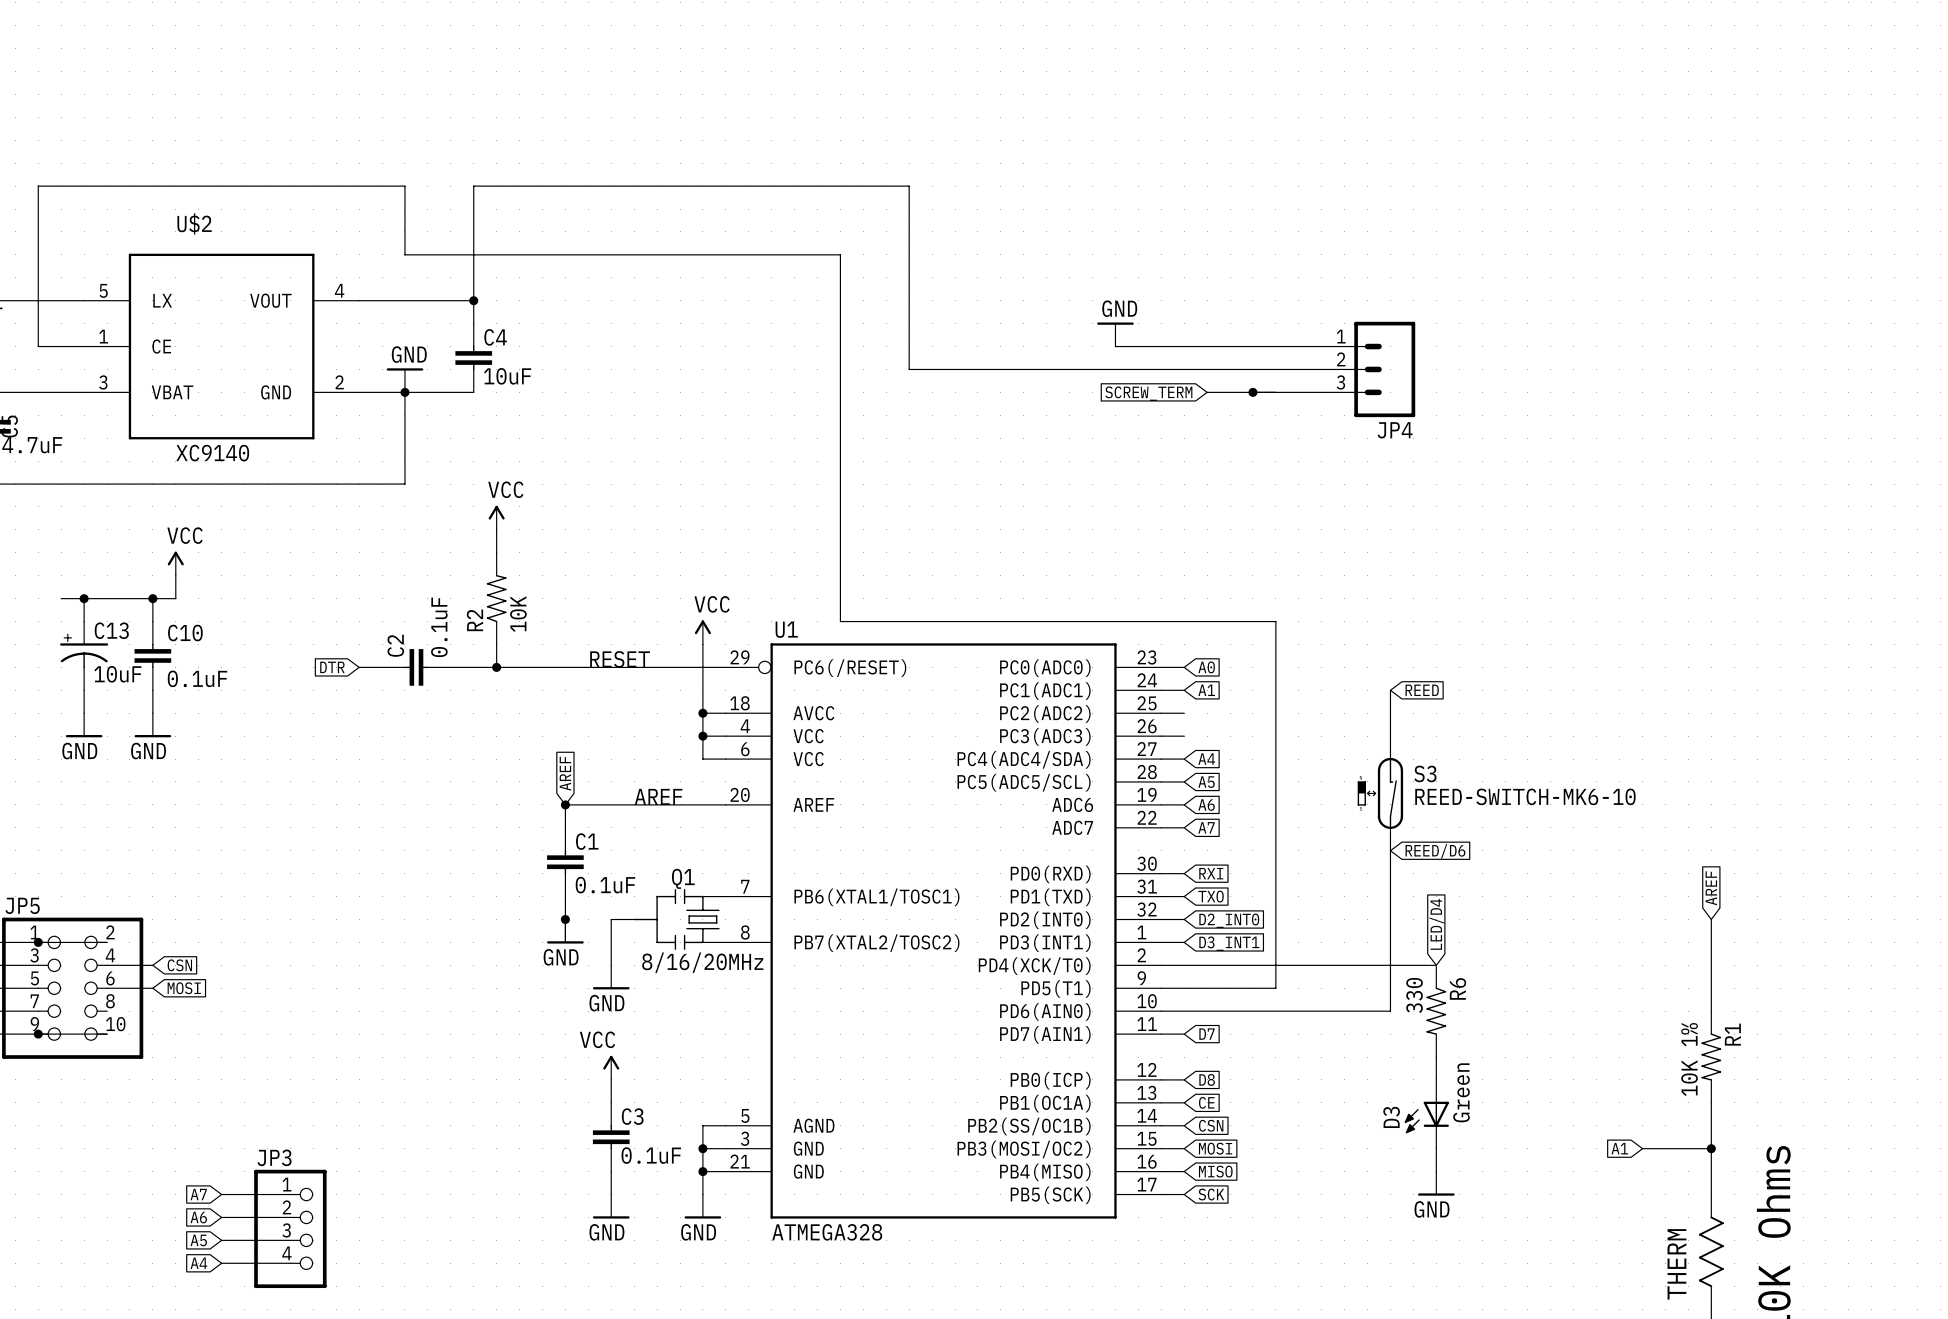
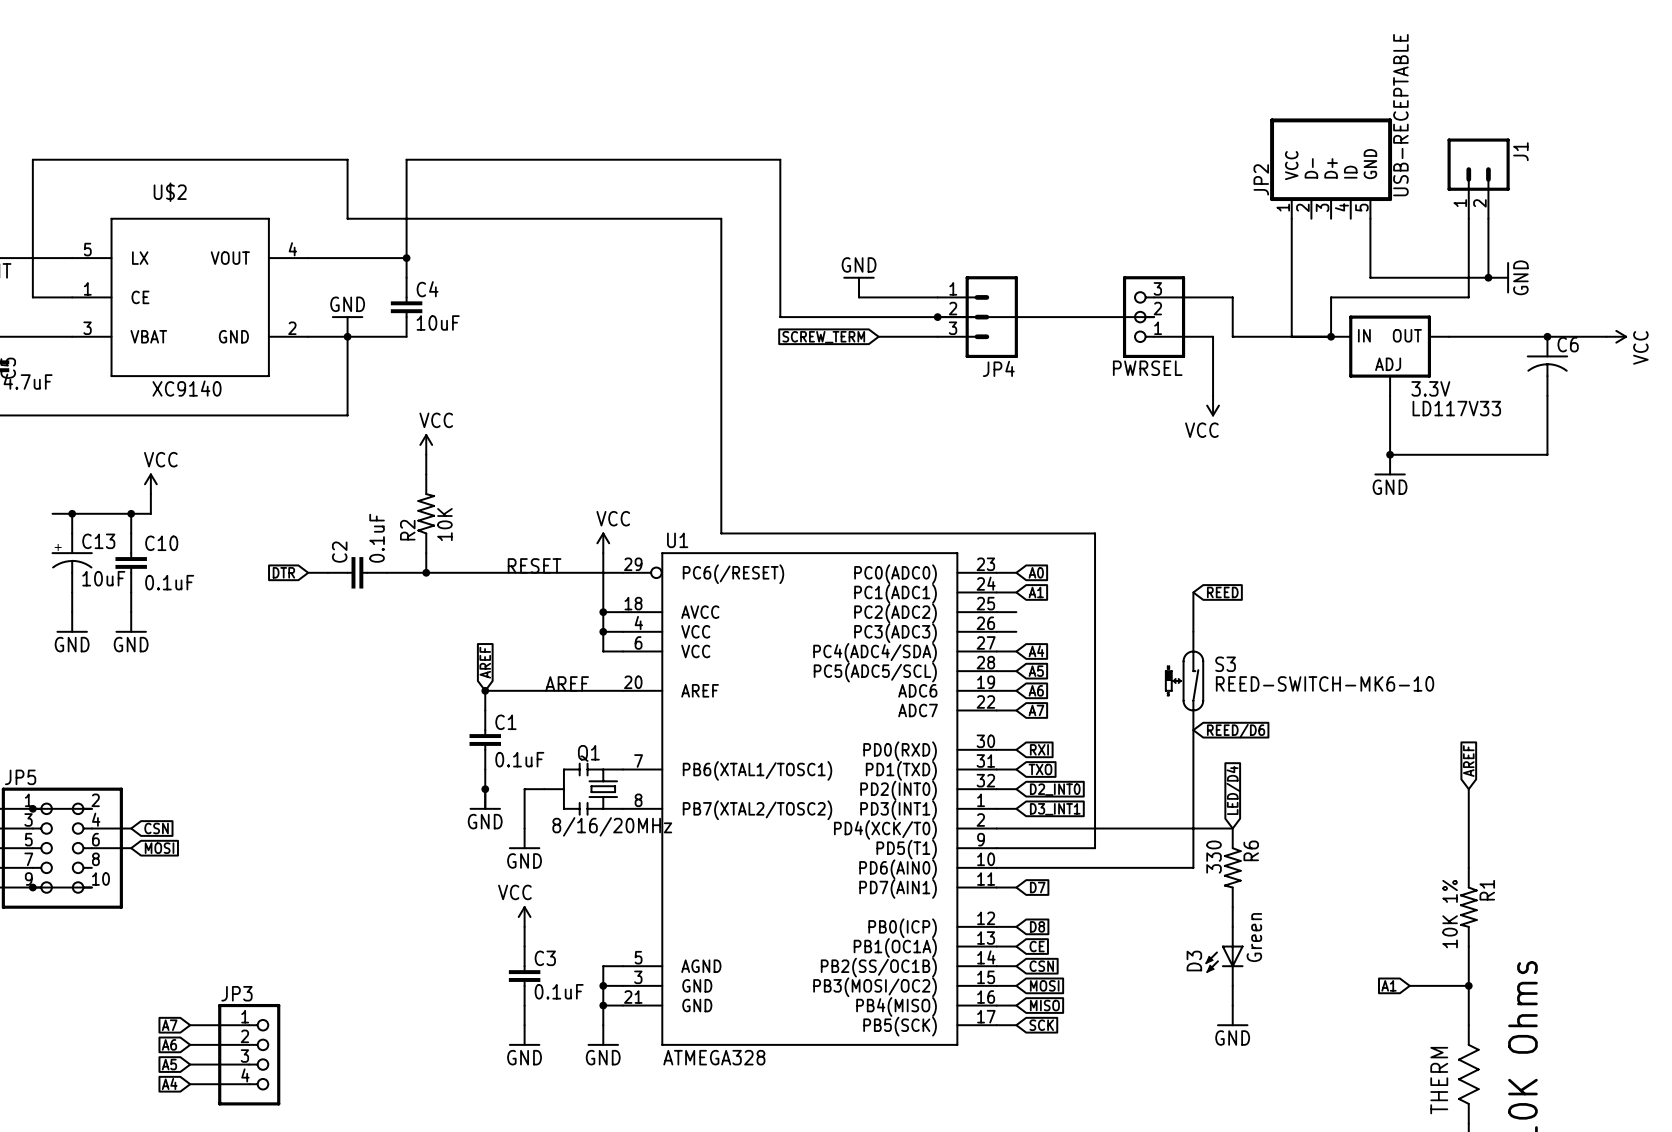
JP2: none -> USB-RECEPTABLE (1331, 168)
J1: none -> (1478, 178)
wire: none -> (1291, 218) (1291, 336)
wire: none -> (1370, 218) (1370, 277) (1488, 277) (1488, 218)
wire: none -> (1468, 218) (1468, 297) (1331, 297) (1331, 336) (1232, 336) (1232, 297) (1154, 297)
junction: none -> (1488, 277)
power symbol: none -> GND (1498, 277)
power symbol position: GND (1115, 334) -> GND (859, 287)
wire: none -> (859, 297) (937, 297)
wire: (1115, 346) (1321, 346) -> none
junction: none -> (937, 317)
PWRSEL: none -> (1154, 317)
JP4 position: (1368, 369) -> (977, 317)
wire: none -> (878, 336) (937, 336)
wire: (1207, 392) (1321, 392) -> none
junction: (1252, 392) -> none
wire: none -> (1154, 336) (1213, 336) (1213, 395)
junction: none -> (1331, 336)
wire: none -> (1449, 336) (1606, 336)
junction: none -> (1547, 336)
power symbol: none -> VCC (1616, 336)
global label position: SCREW_TERM (1148, 393) -> SCREW_TERM (823, 337)
3.3V: none -> LD117V33 (1390, 355)
C6: none -> (1547, 366)
wire: none -> (1390, 395) (1390, 454) (1547, 454) (1547, 395)
power symbol: none -> VCC (1213, 406)
junction: none -> (1390, 454)
power symbol: none -> GND (1390, 465)

